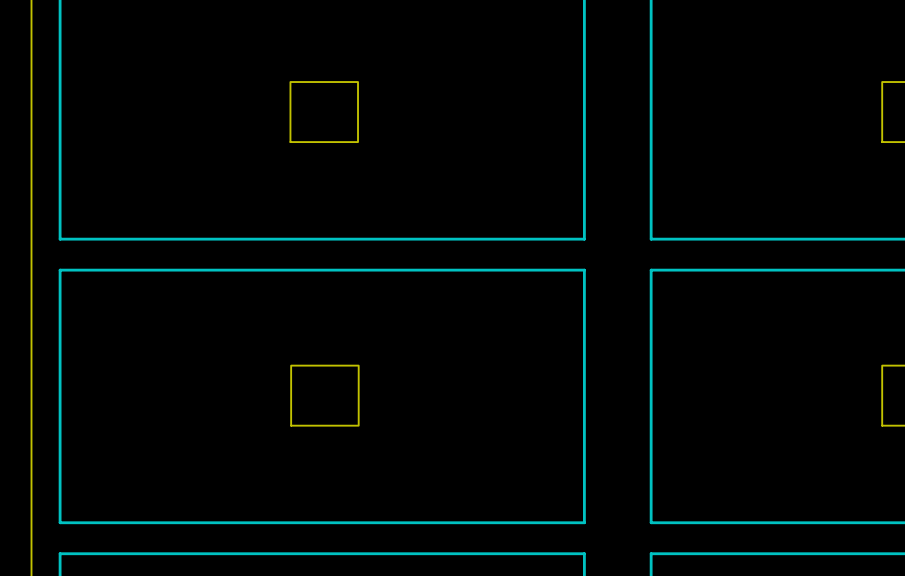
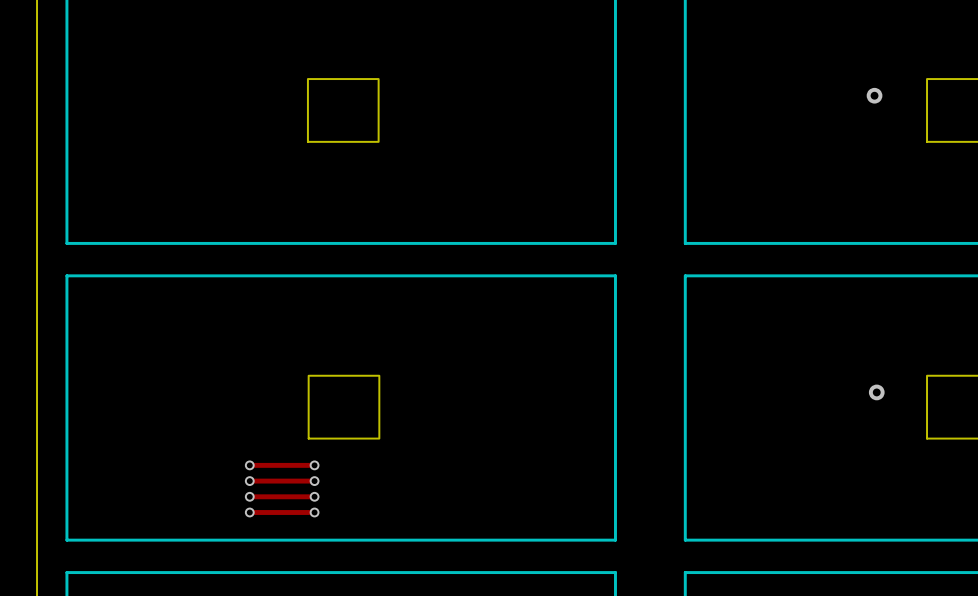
via: none -> (874, 95)
via: none -> (876, 392)
track: none -> (249, 465) (314, 465)
via: none -> (249, 465)
via: none -> (314, 465)
track: none -> (249, 481) (314, 481)
via: none -> (249, 481)
via: none -> (314, 481)
track: none -> (249, 496) (314, 496)
via: none -> (249, 496)
via: none -> (314, 496)
track: none -> (249, 512) (314, 512)
via: none -> (249, 512)
via: none -> (314, 512)

